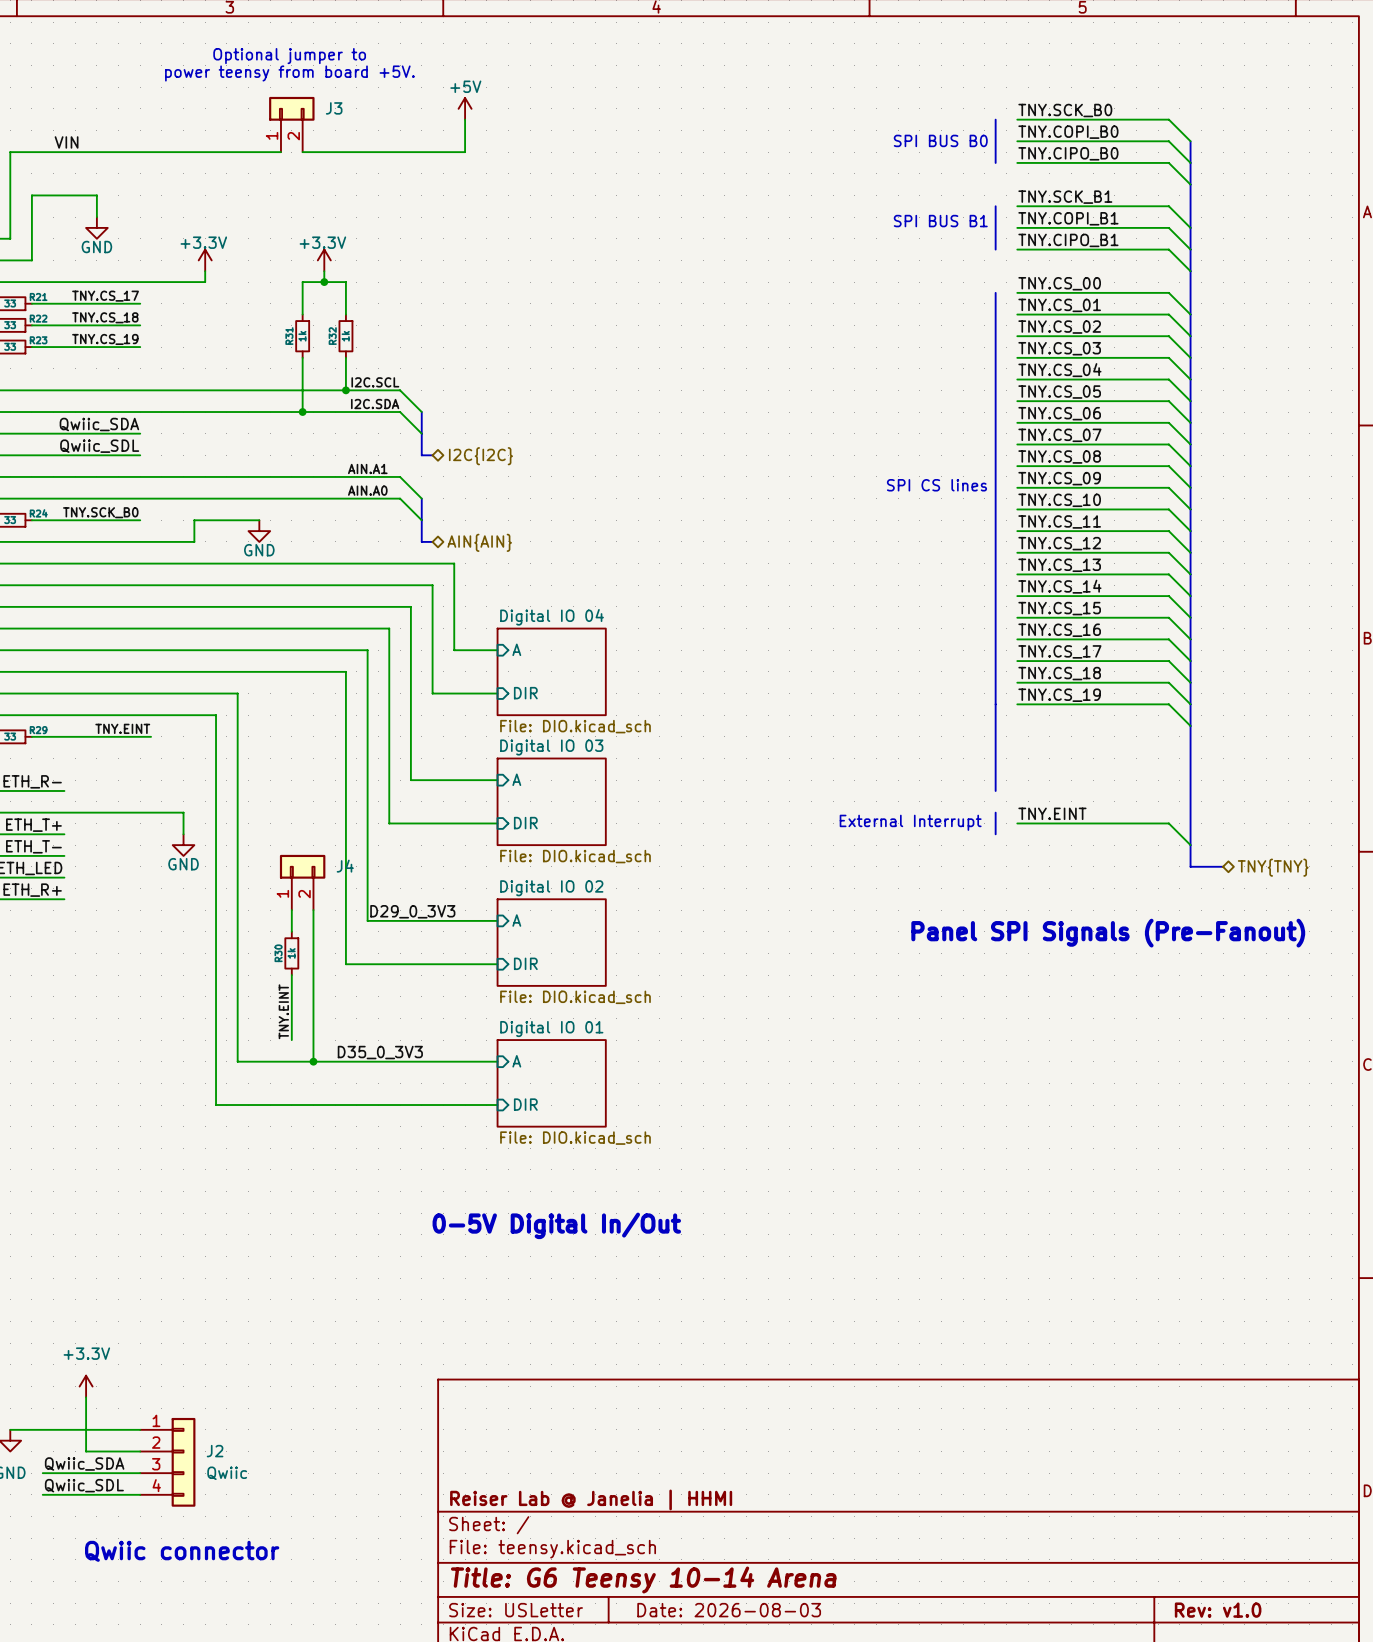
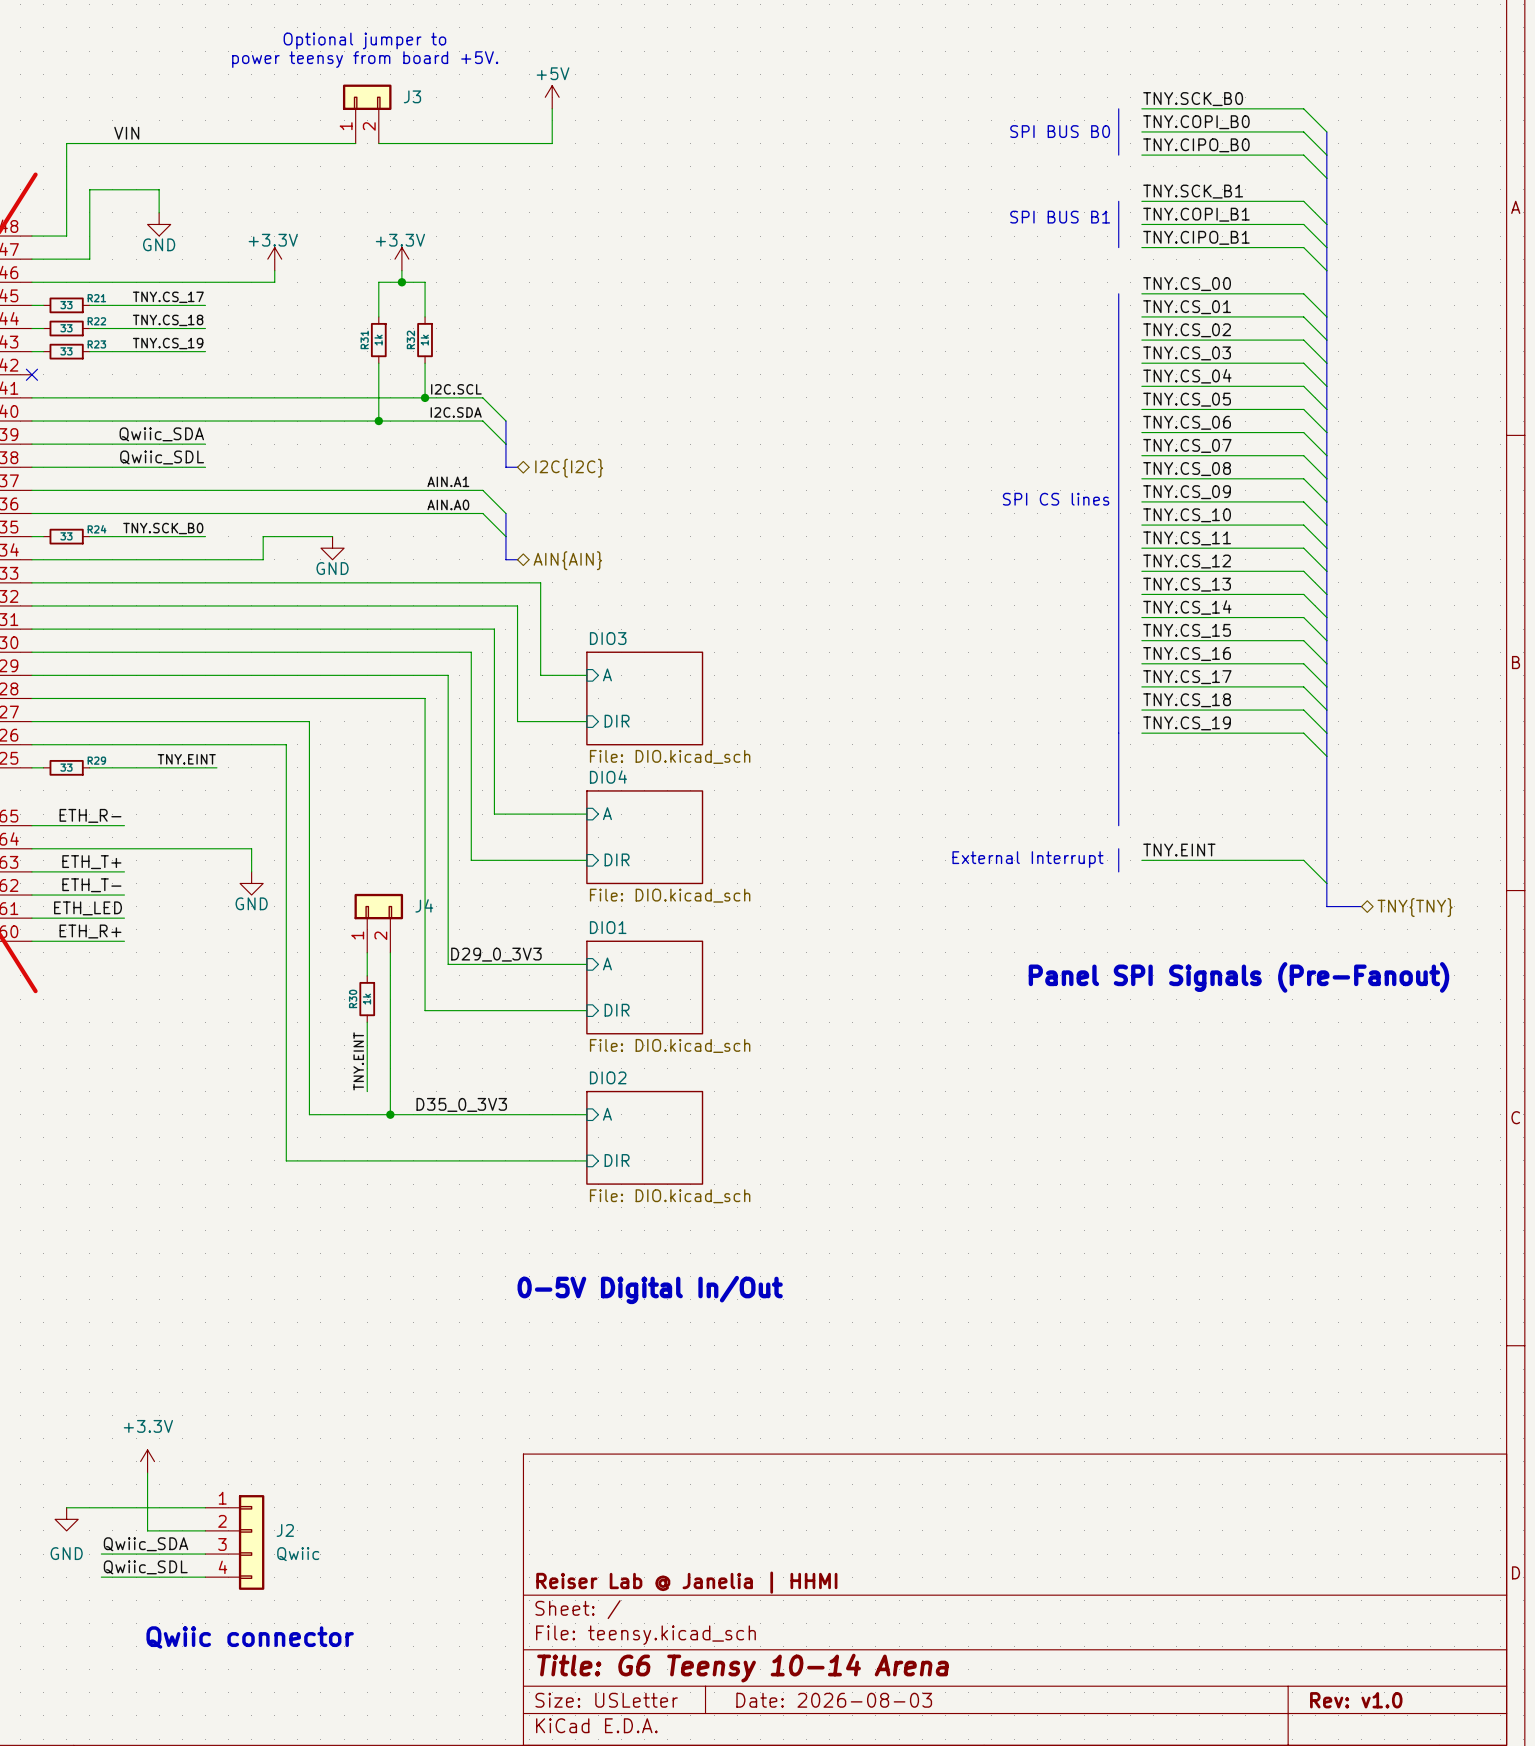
sheet Digital IO 04 name: Digital IO 04 (552, 617) -> DIO3 (608, 638)
sheet Digital IO 03 name: Digital IO 03 (551, 747) -> DIO4 (608, 777)
sheet Digital IO 02 name: Digital IO 02 (551, 888) -> DIO1 (608, 927)
sheet Digital IO 01 name: Digital IO 01 (551, 1029) -> DIO2 (608, 1077)

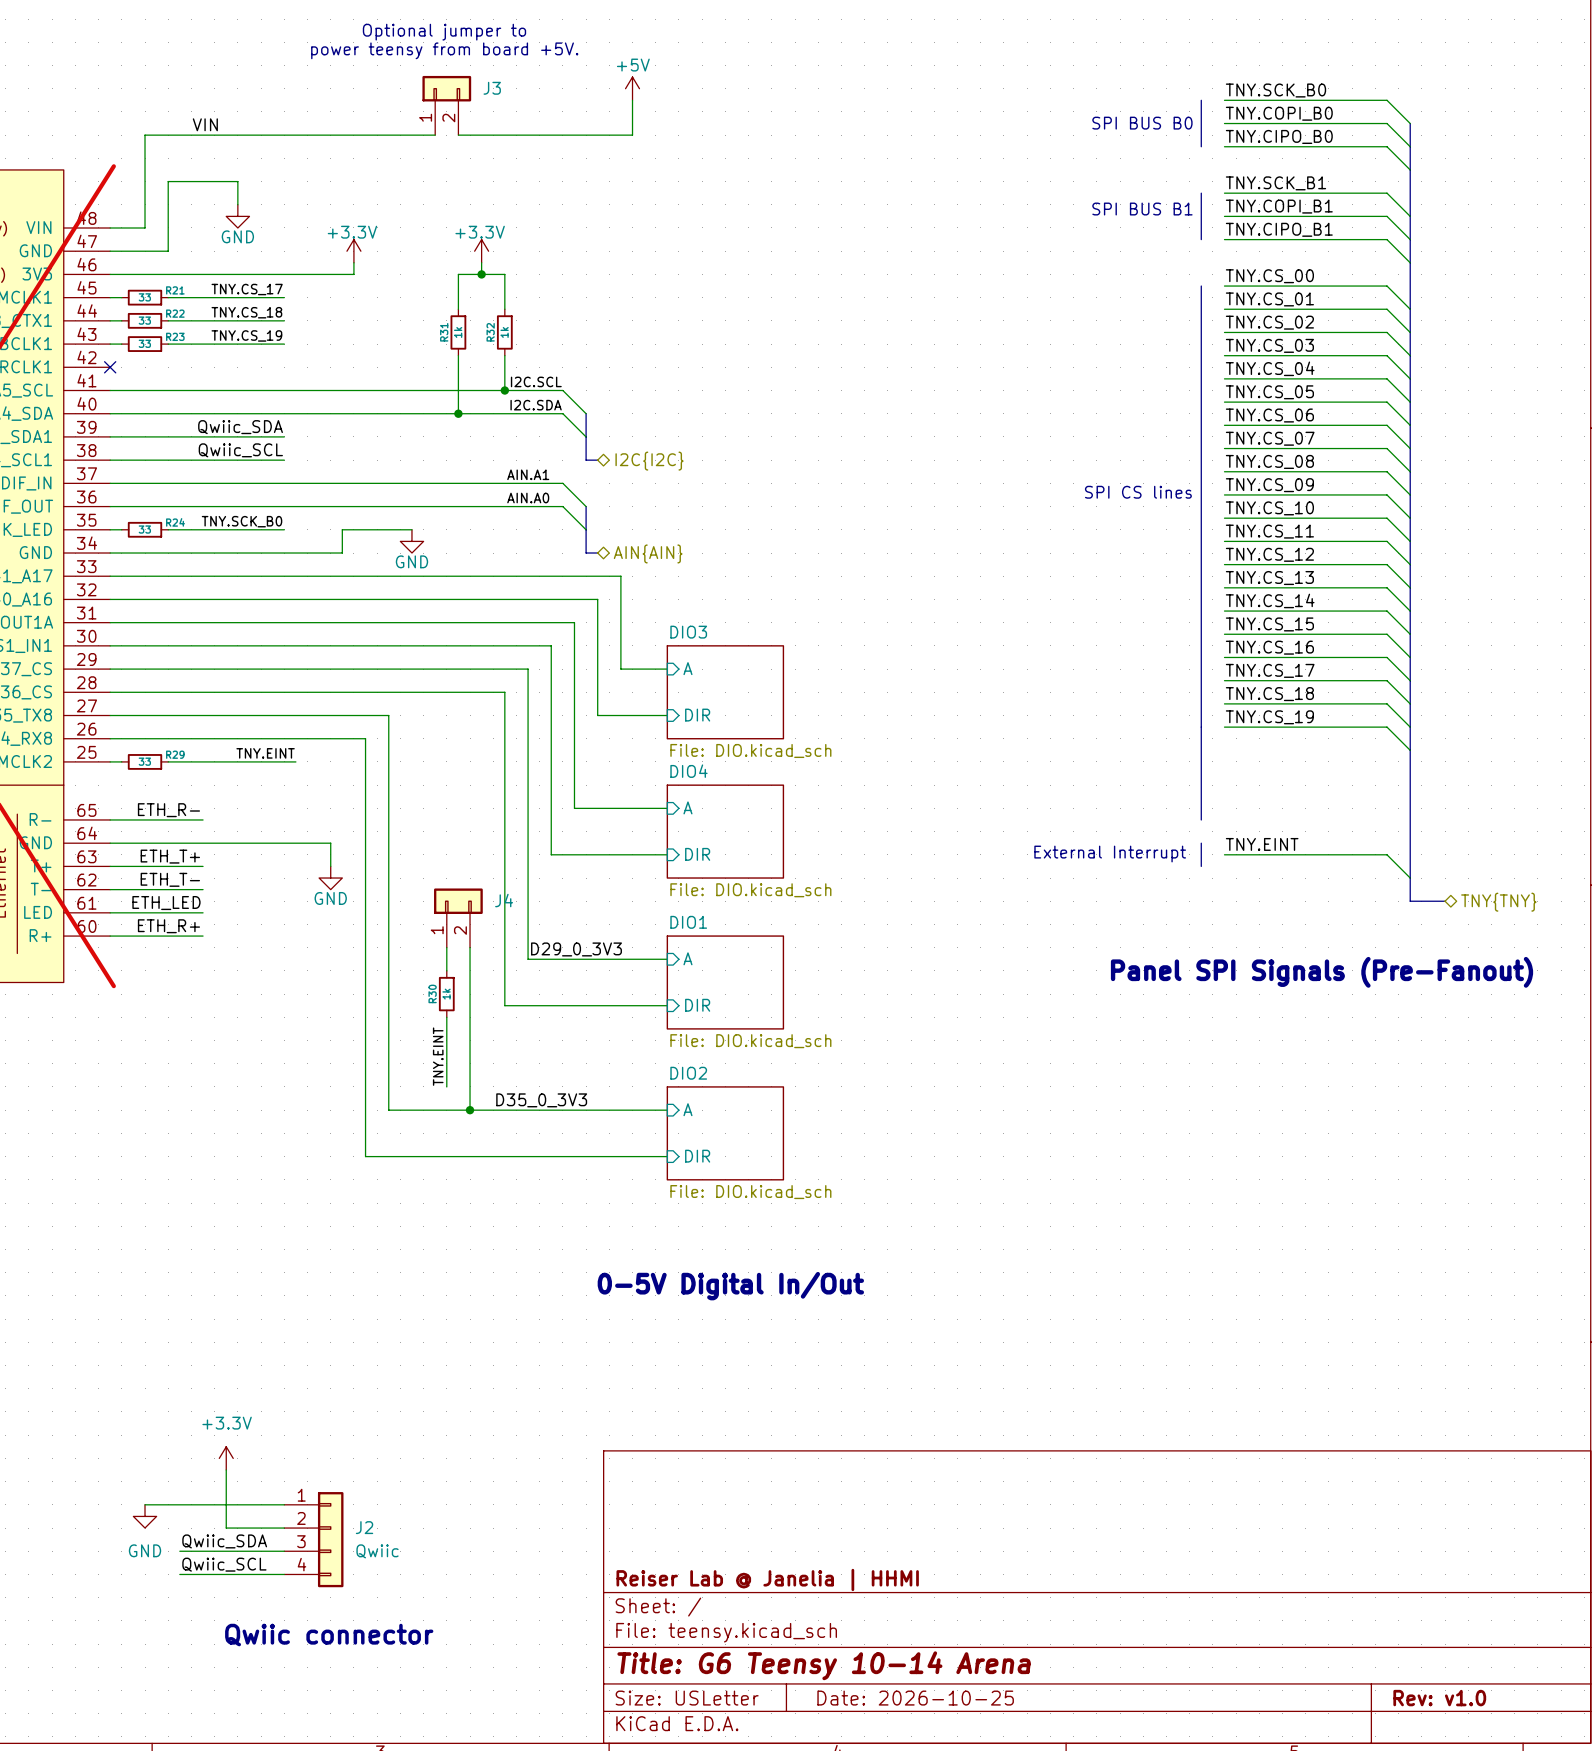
label: Qwiic_SDL (162, 457) -> Qwiic_SCL (240, 450)
label: Qwiic_SDL (145, 1567) -> Qwiic_SCL (224, 1564)
title block: Date: 2026-08-03 (834, 1700) -> Date: 2026-10-25 (915, 1698)

